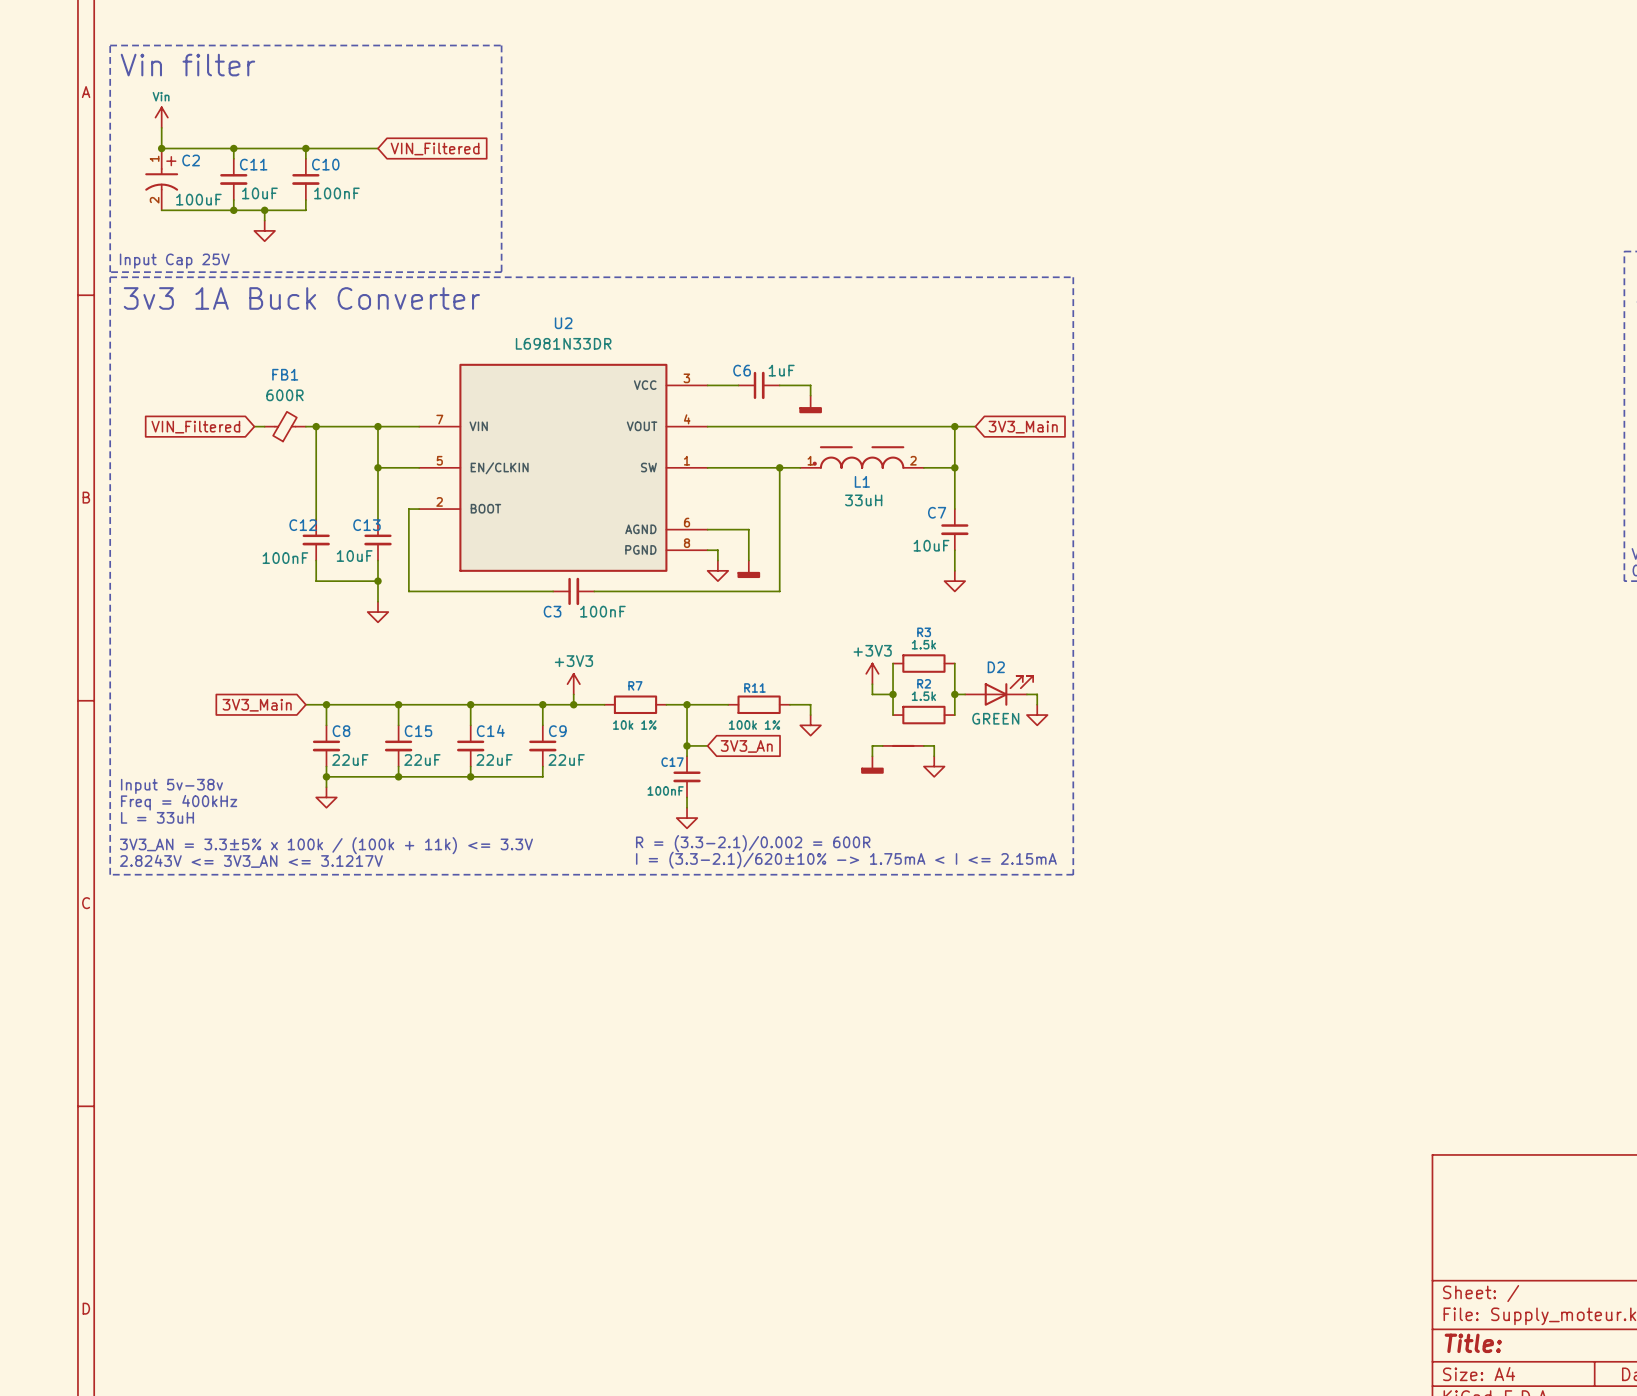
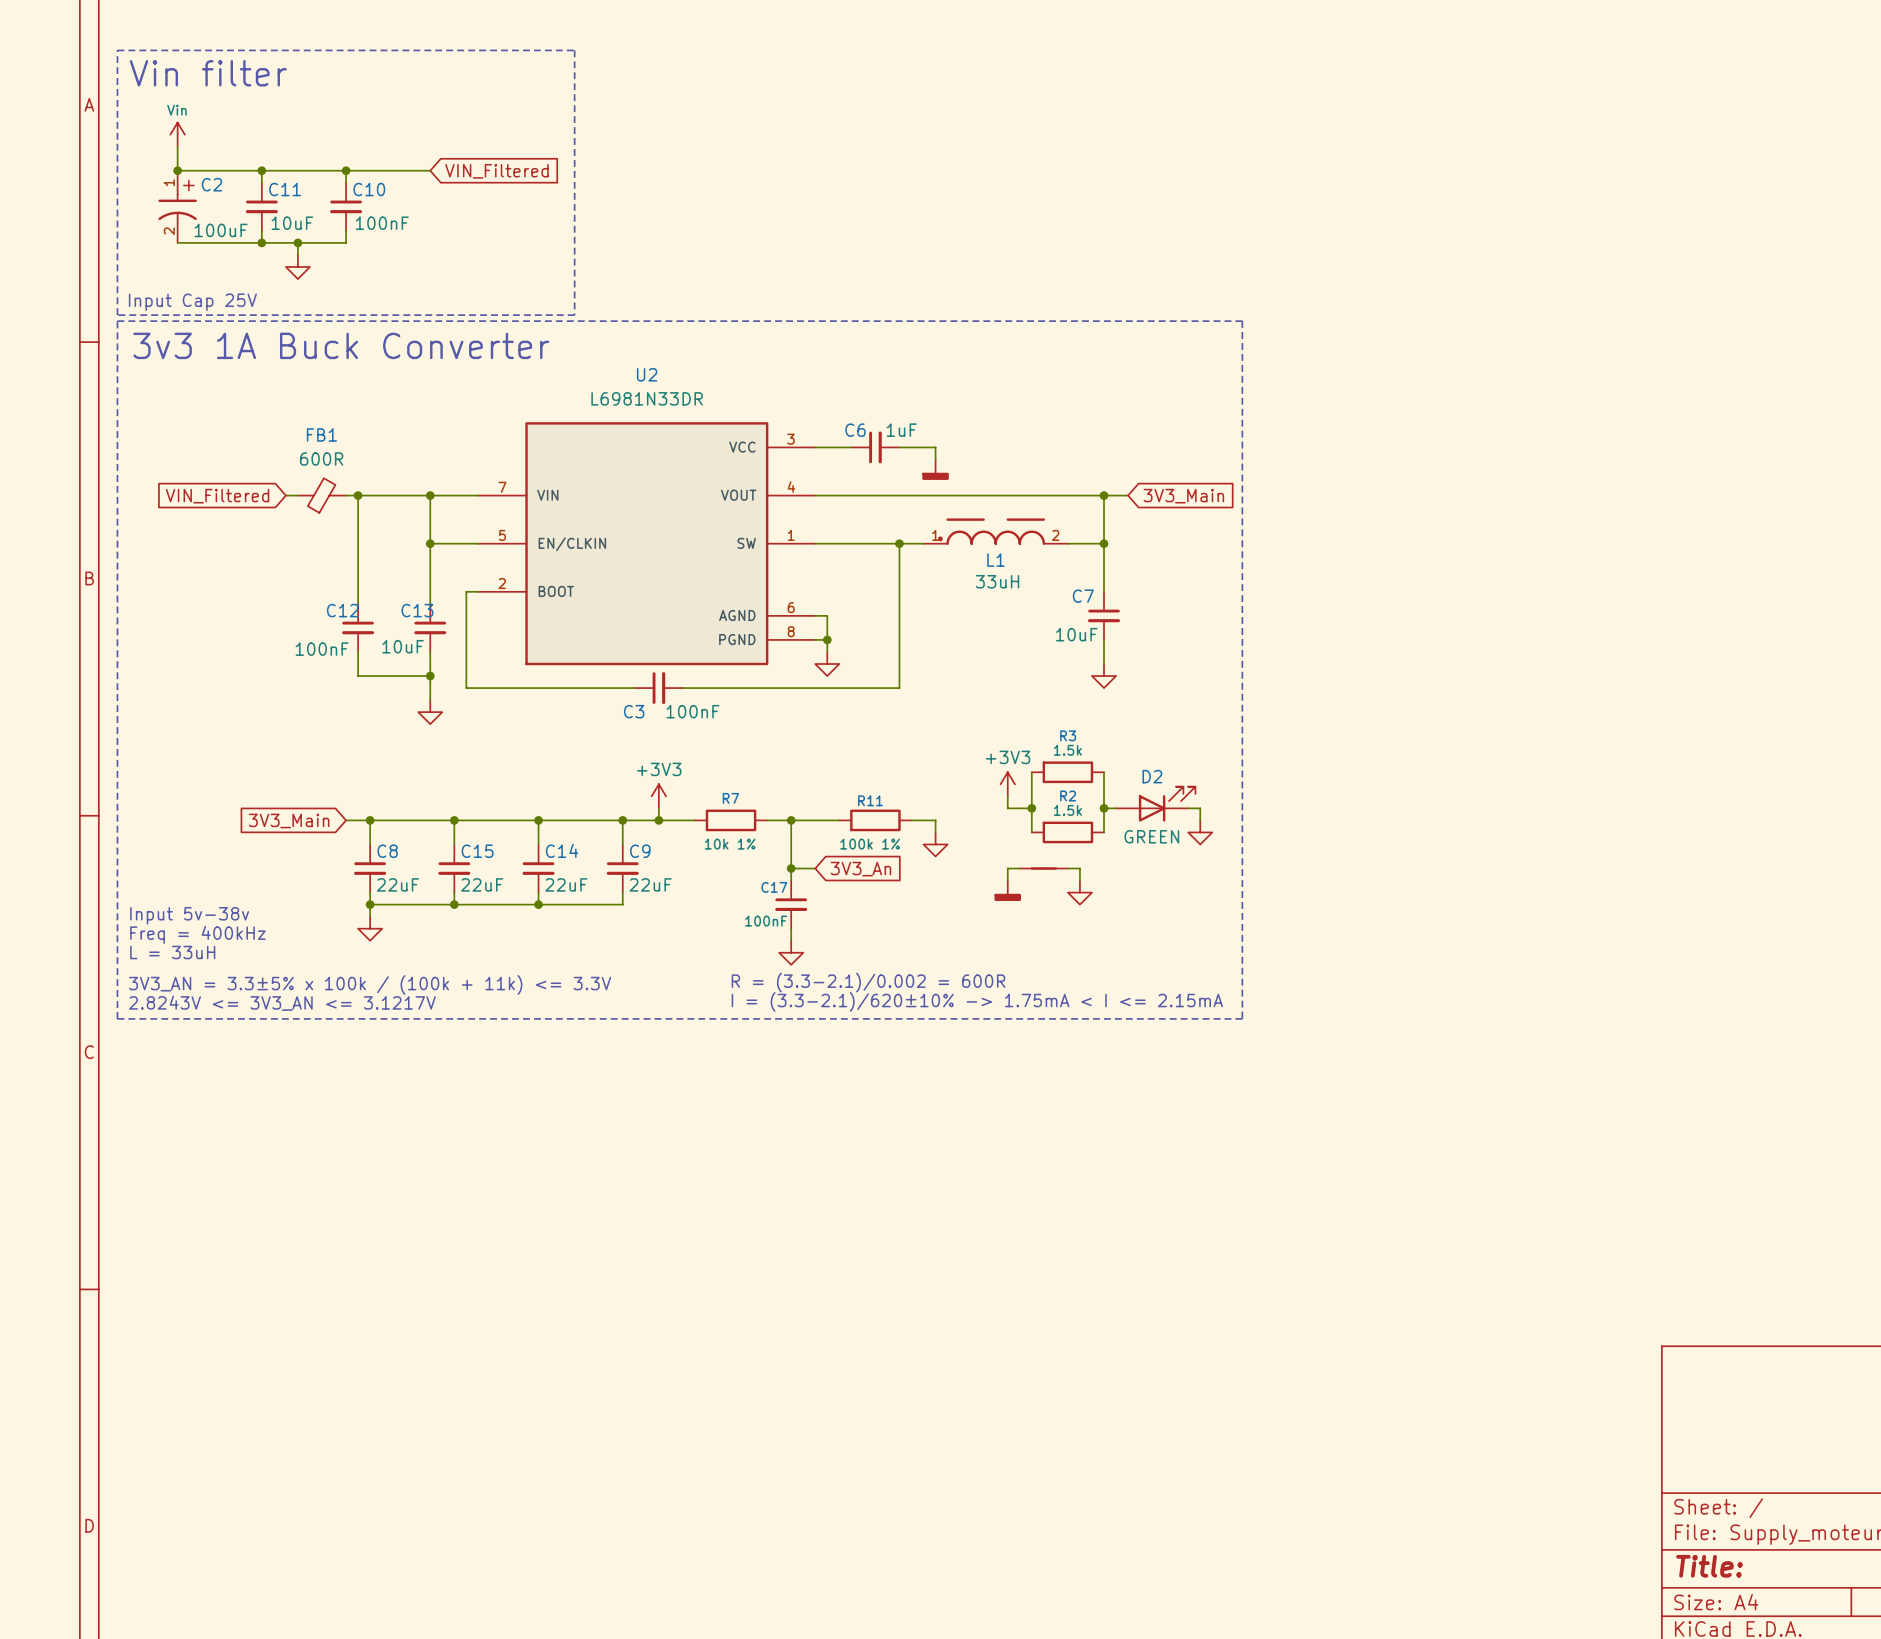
wire: (717, 529) (748, 529) (748, 560) -> (827, 615) (827, 639)
junction: none -> (827, 639)
power symbol: (748, 569) -> none

